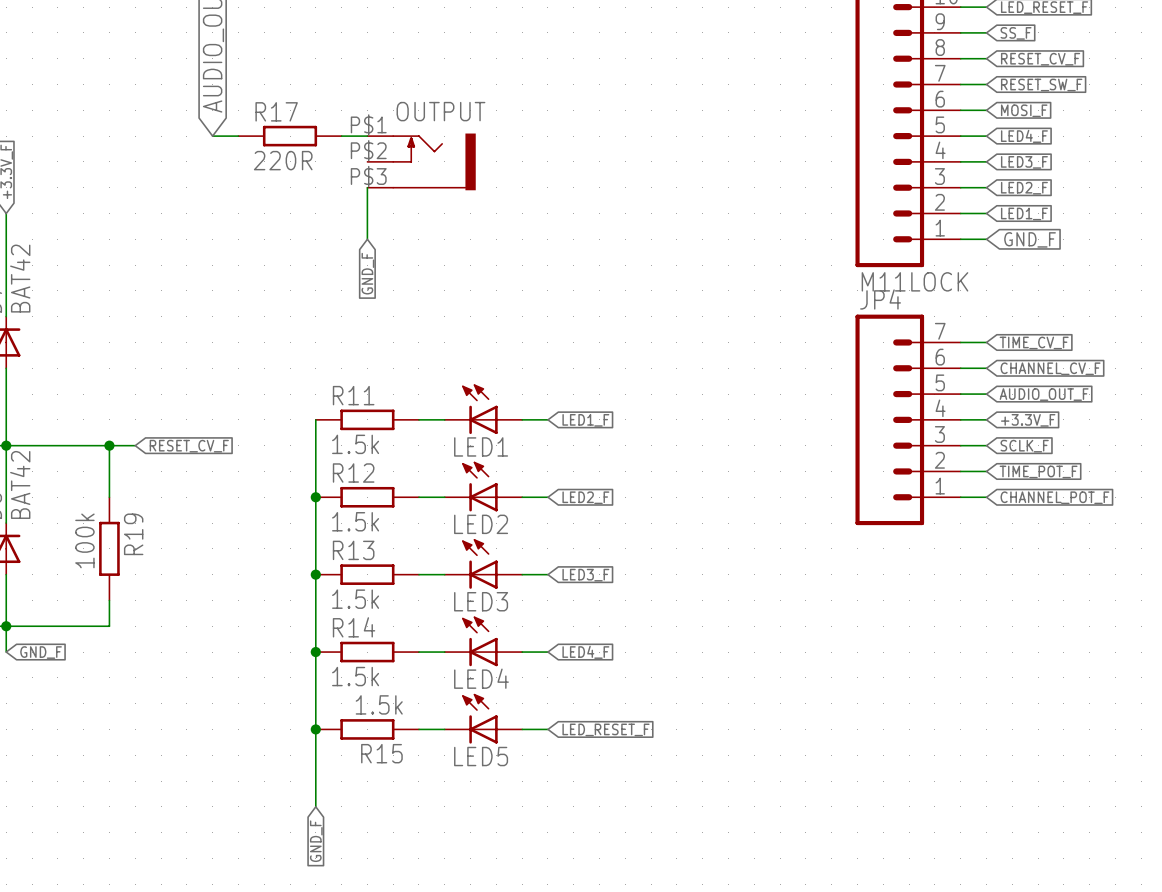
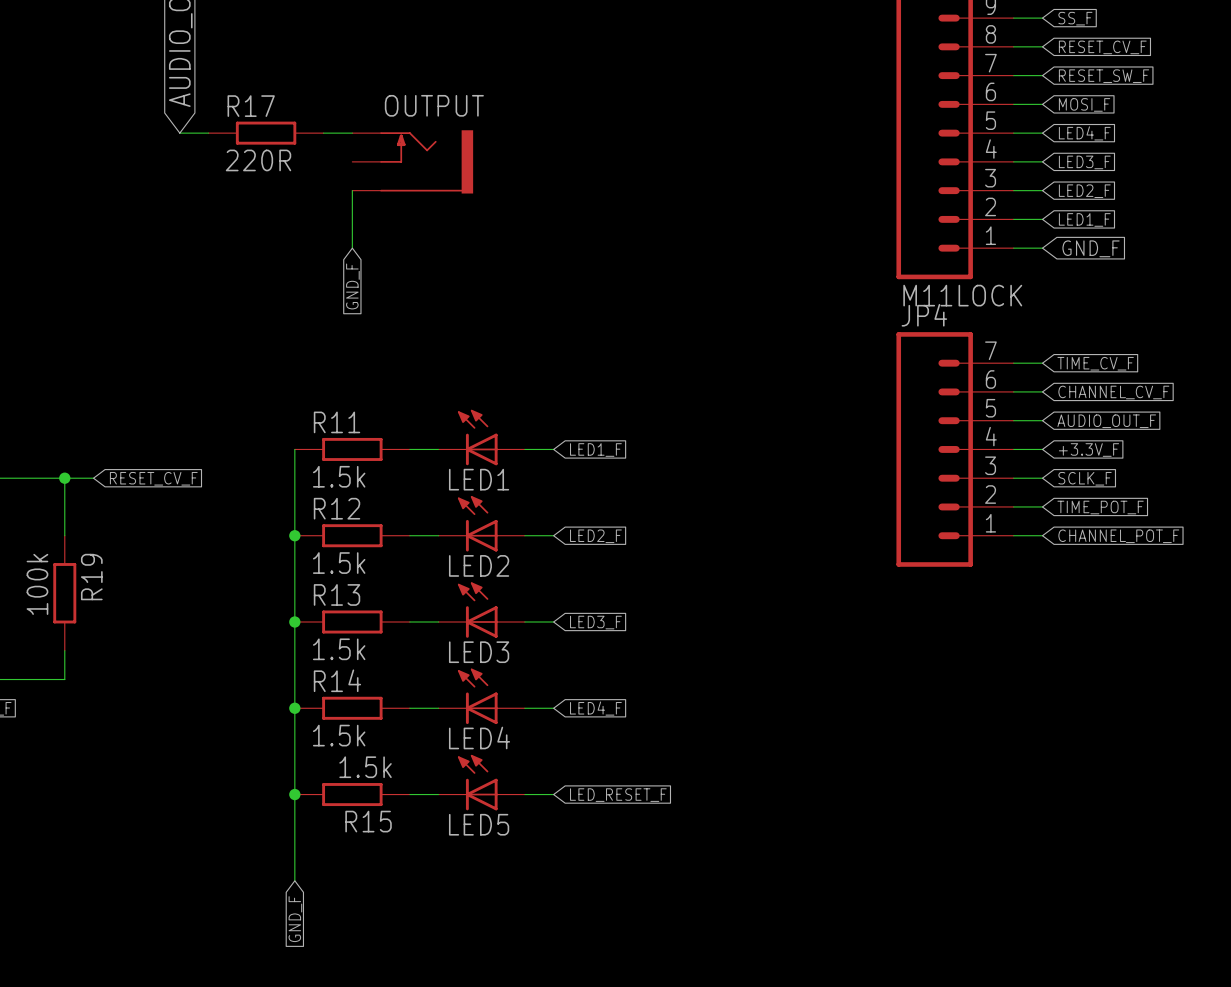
OUTPUT pin number: P$1 (368, 124) -> none
OUTPUT pin number: P$2 (368, 150) -> none
OUTPUT pin number: P$3 (368, 176) -> none

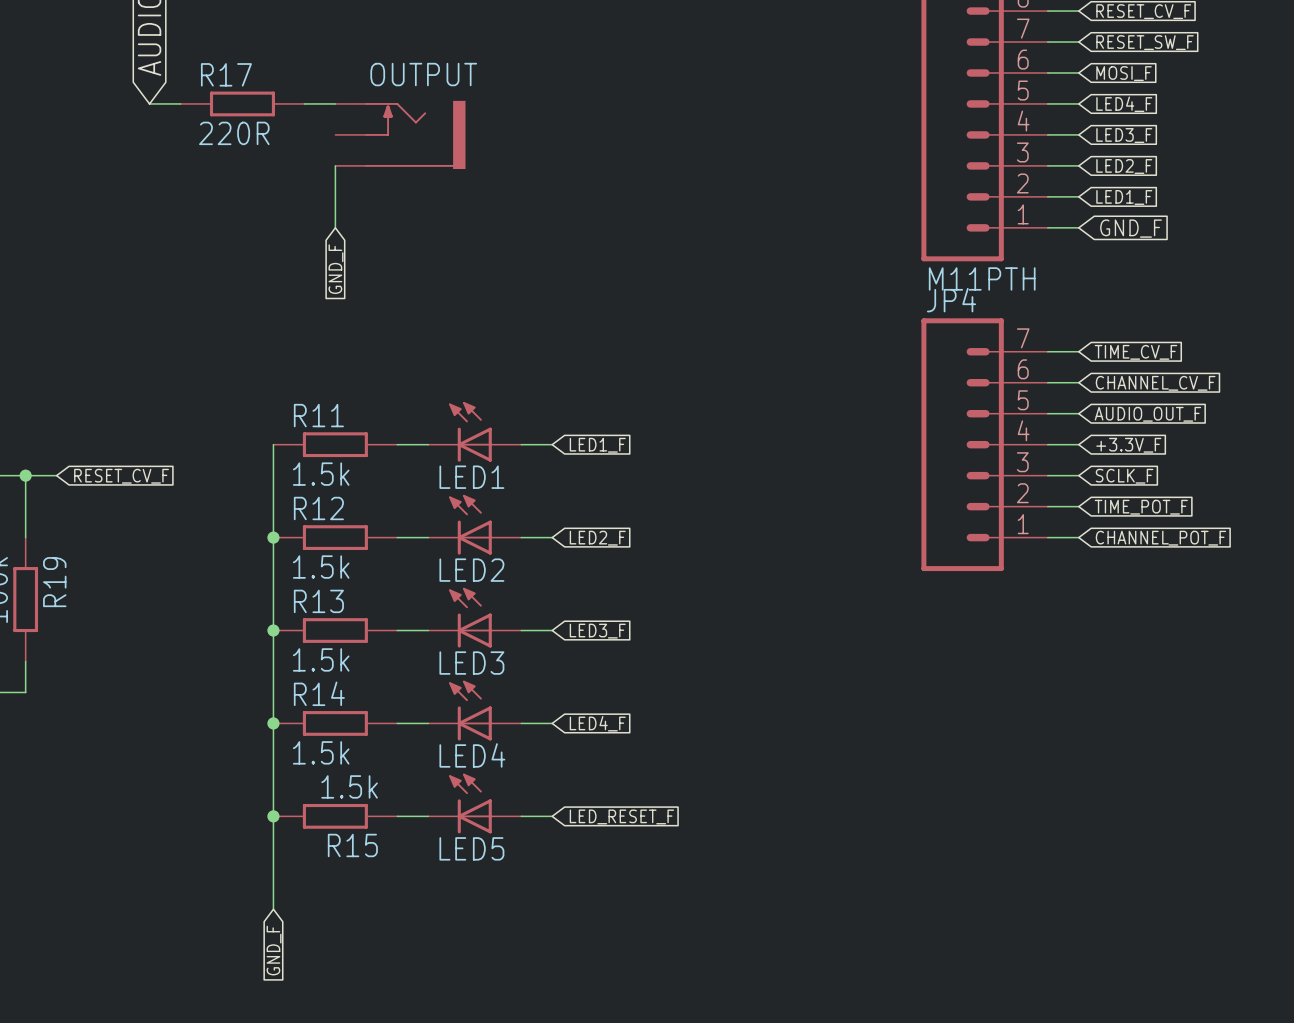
part value: M11LOCK (962, 295) -> M11PTH (982, 278)

